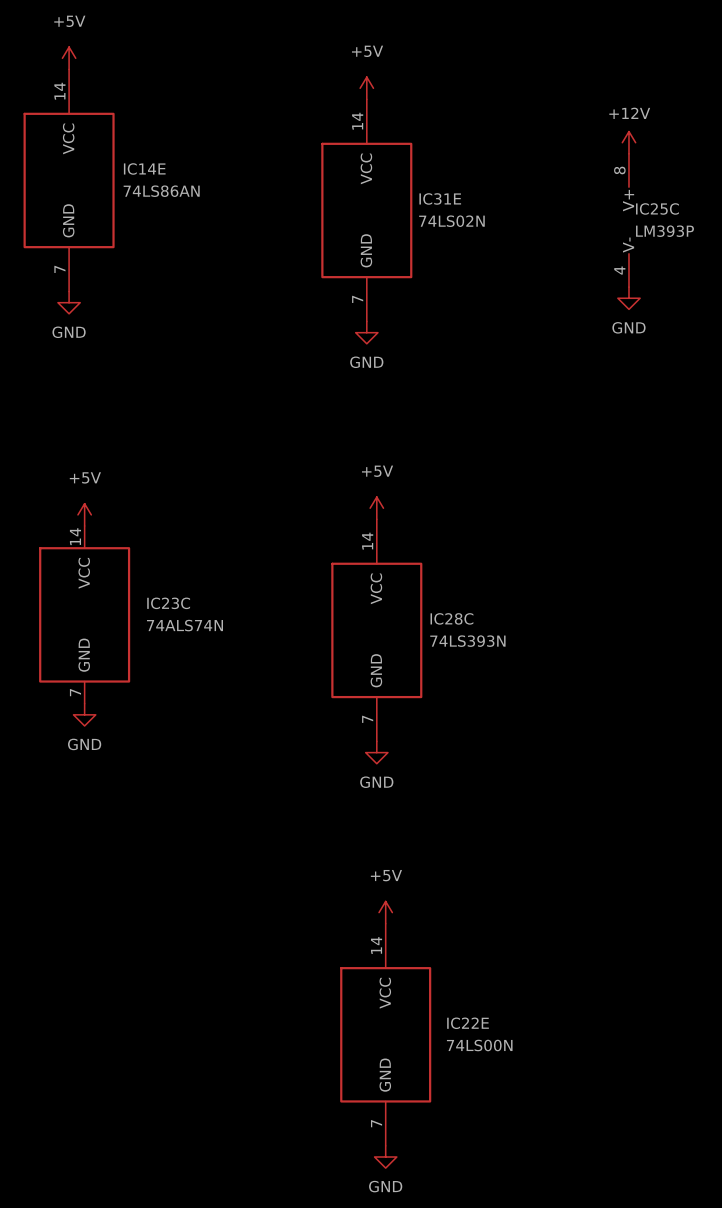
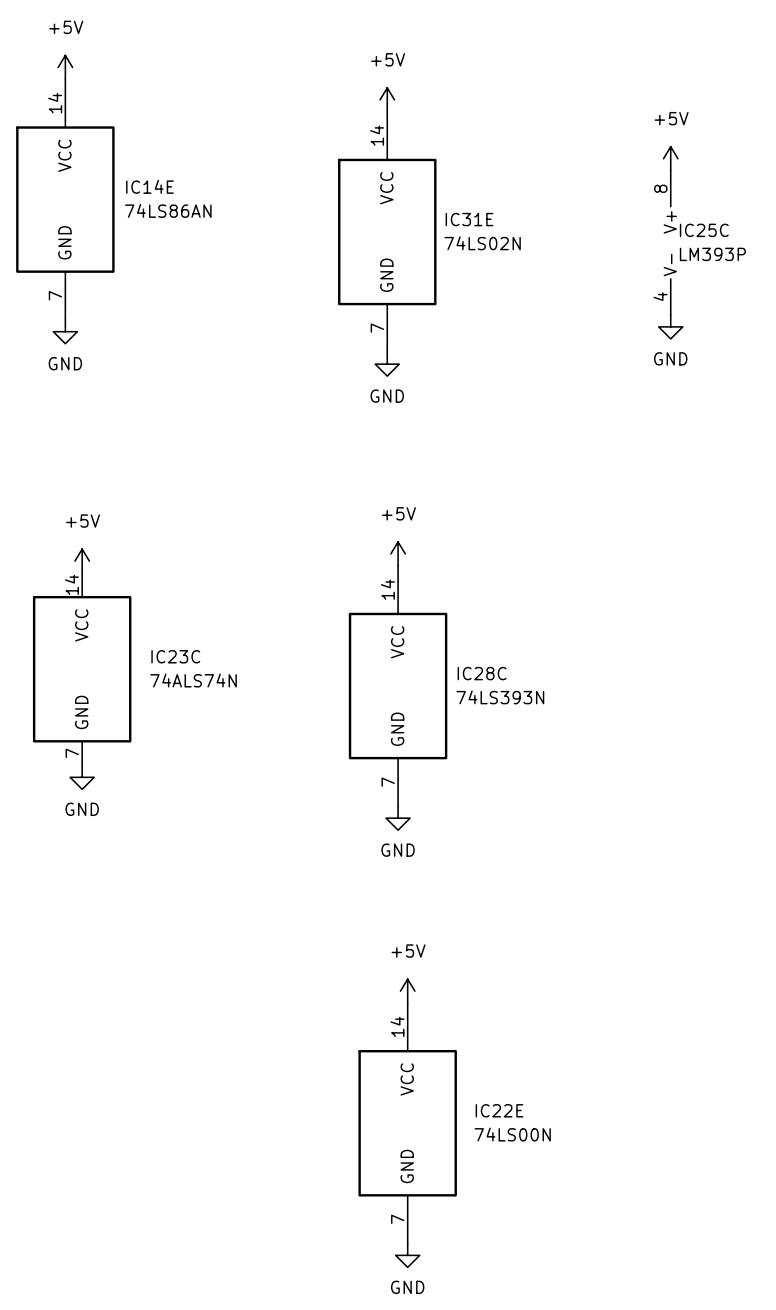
power symbol: +12V (628, 142) -> +5V (670, 158)

